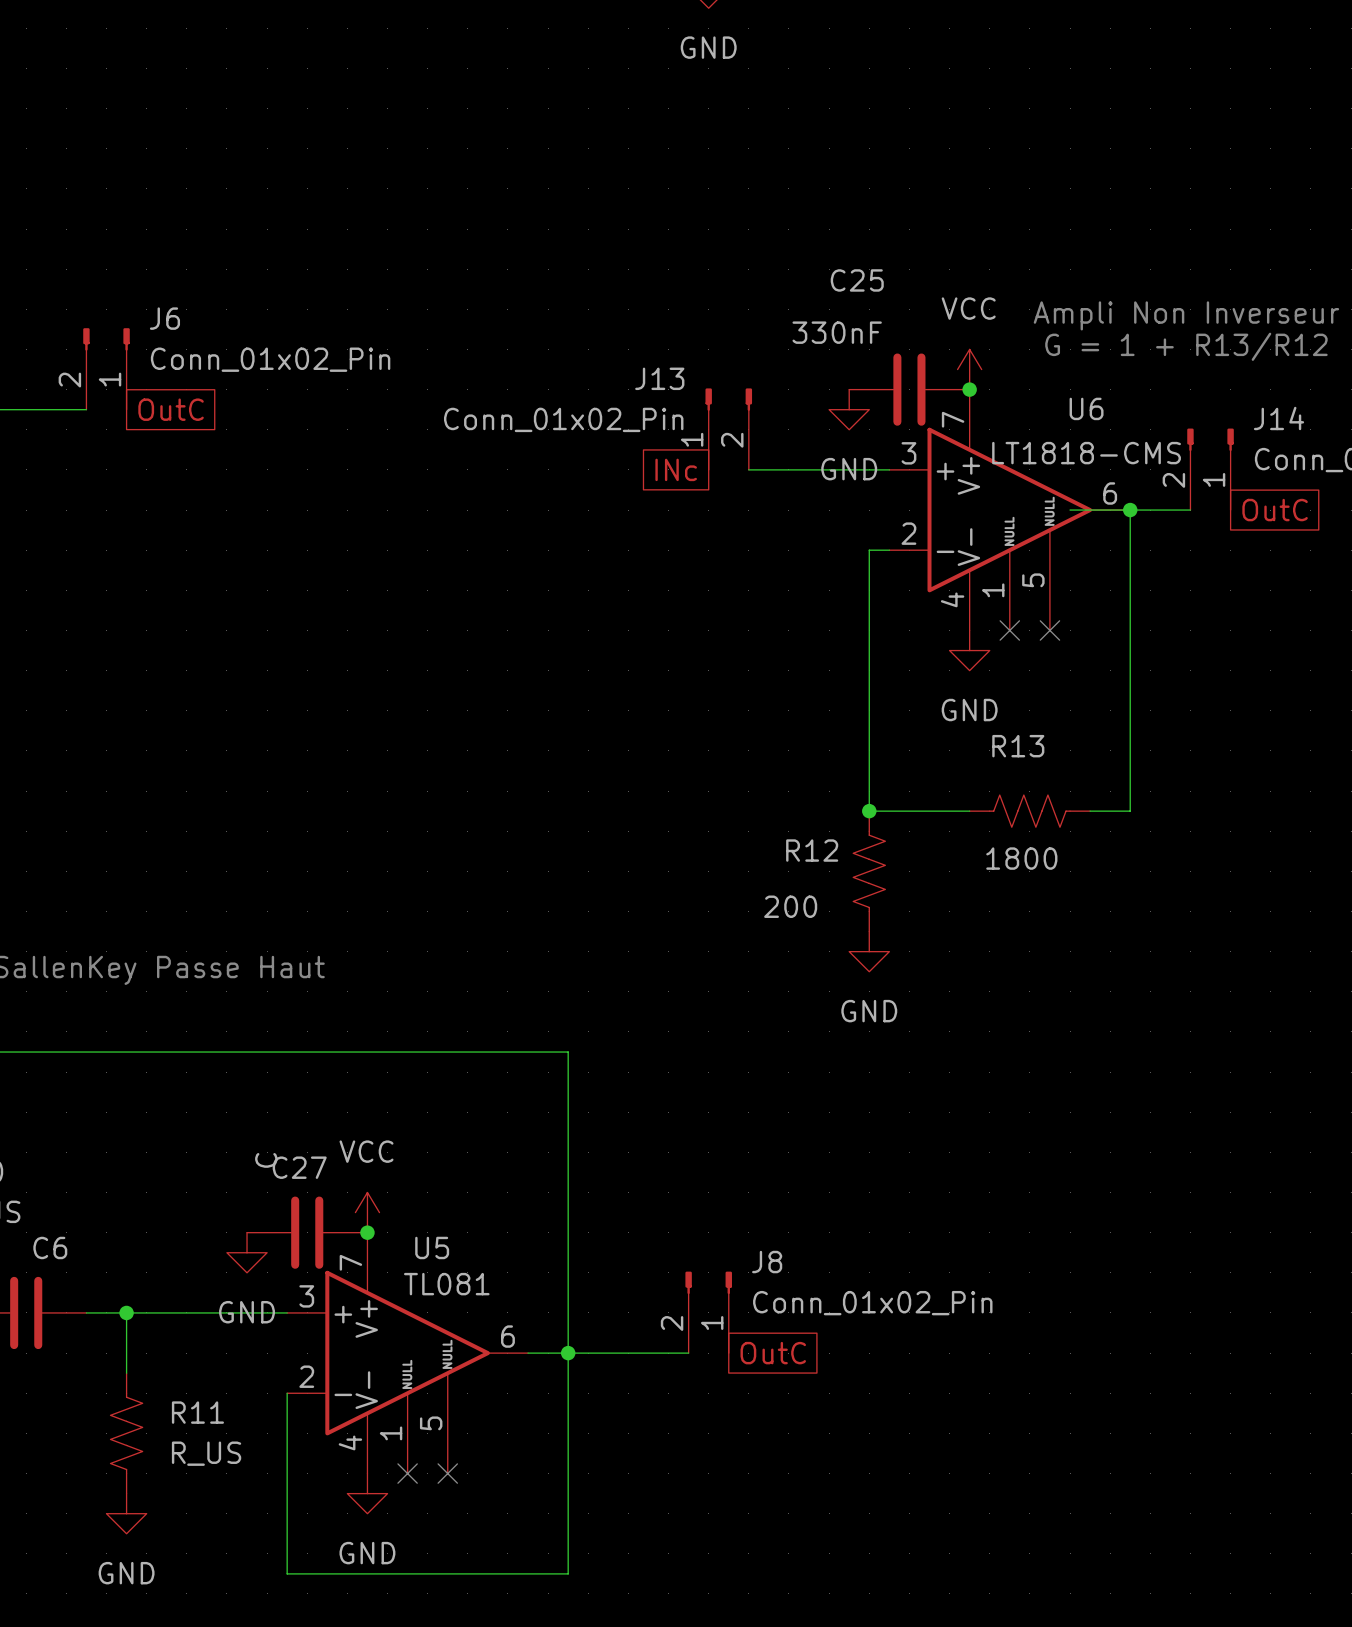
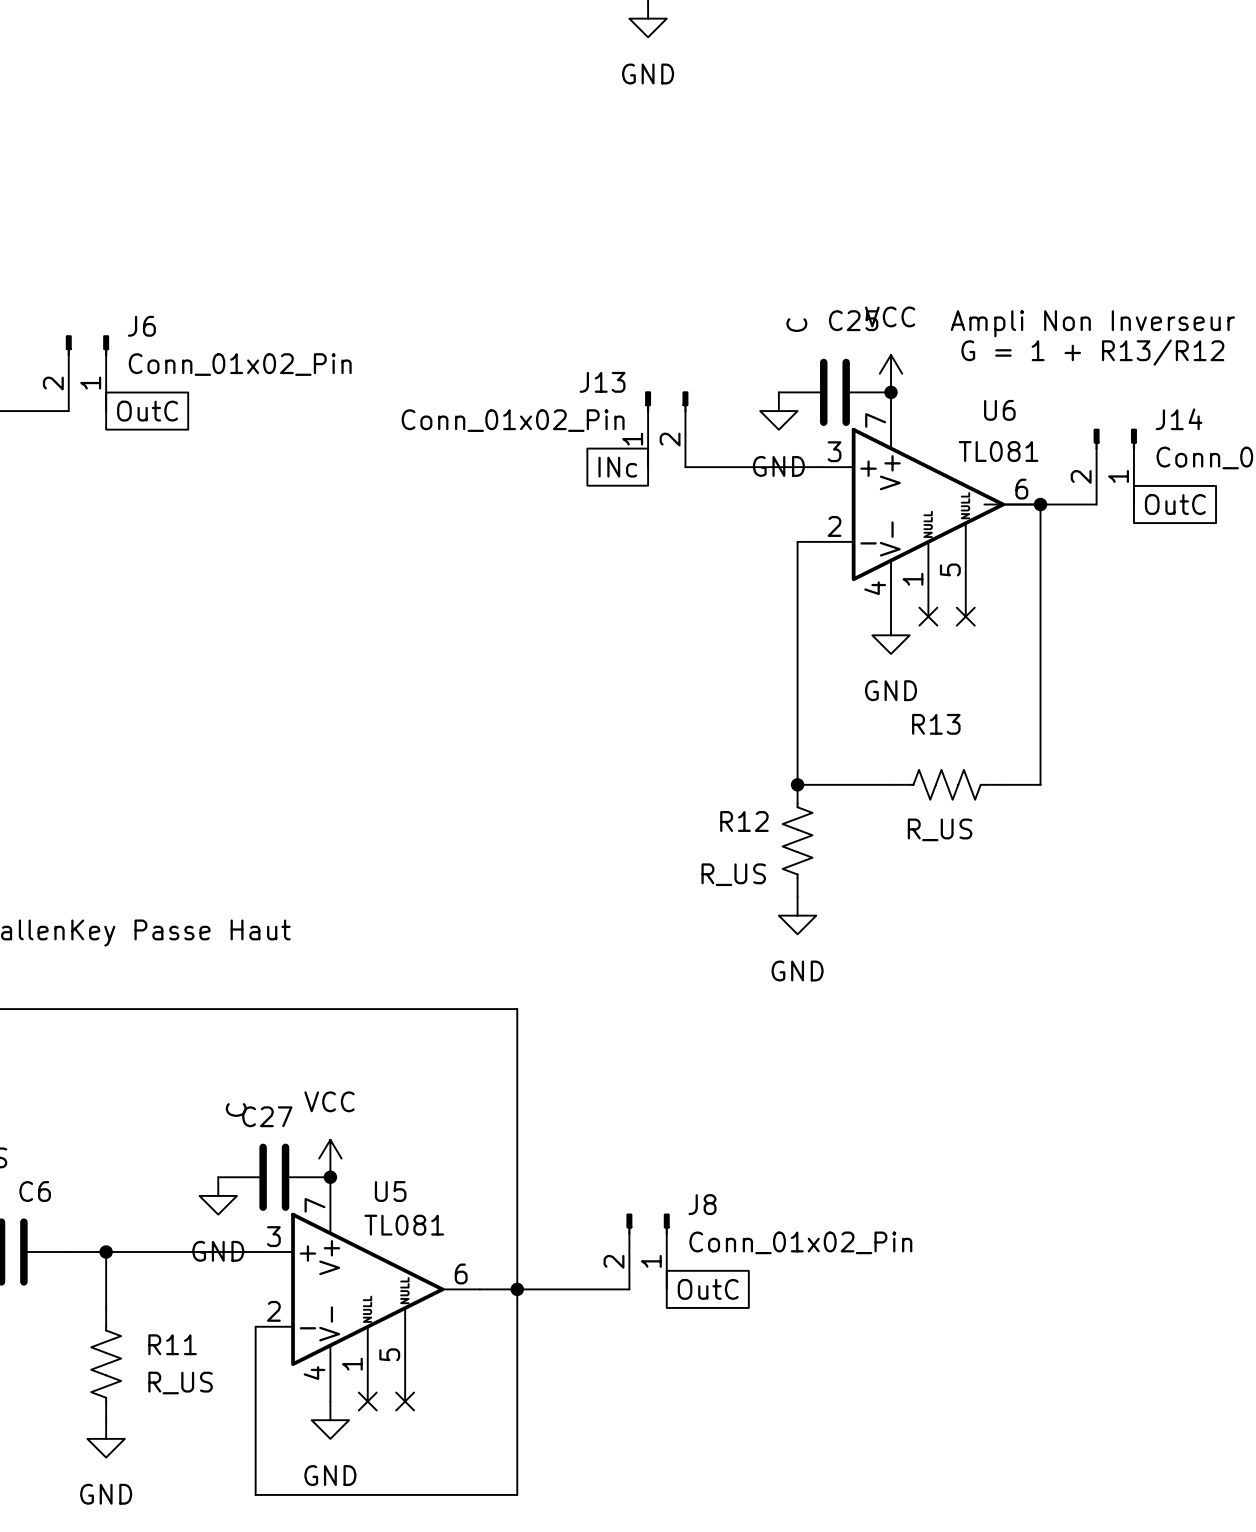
C25 name position: C25 (857, 280) -> C25 (853, 320)
C25 value: 330nF (837, 332) -> C (796, 325)
U6 value: LT1818-CMS (1086, 453) -> TL081 (998, 451)
R13 value: 1800 (1021, 858) -> R_US (940, 829)
R12 value: 200 (790, 906) -> R_US (733, 874)

